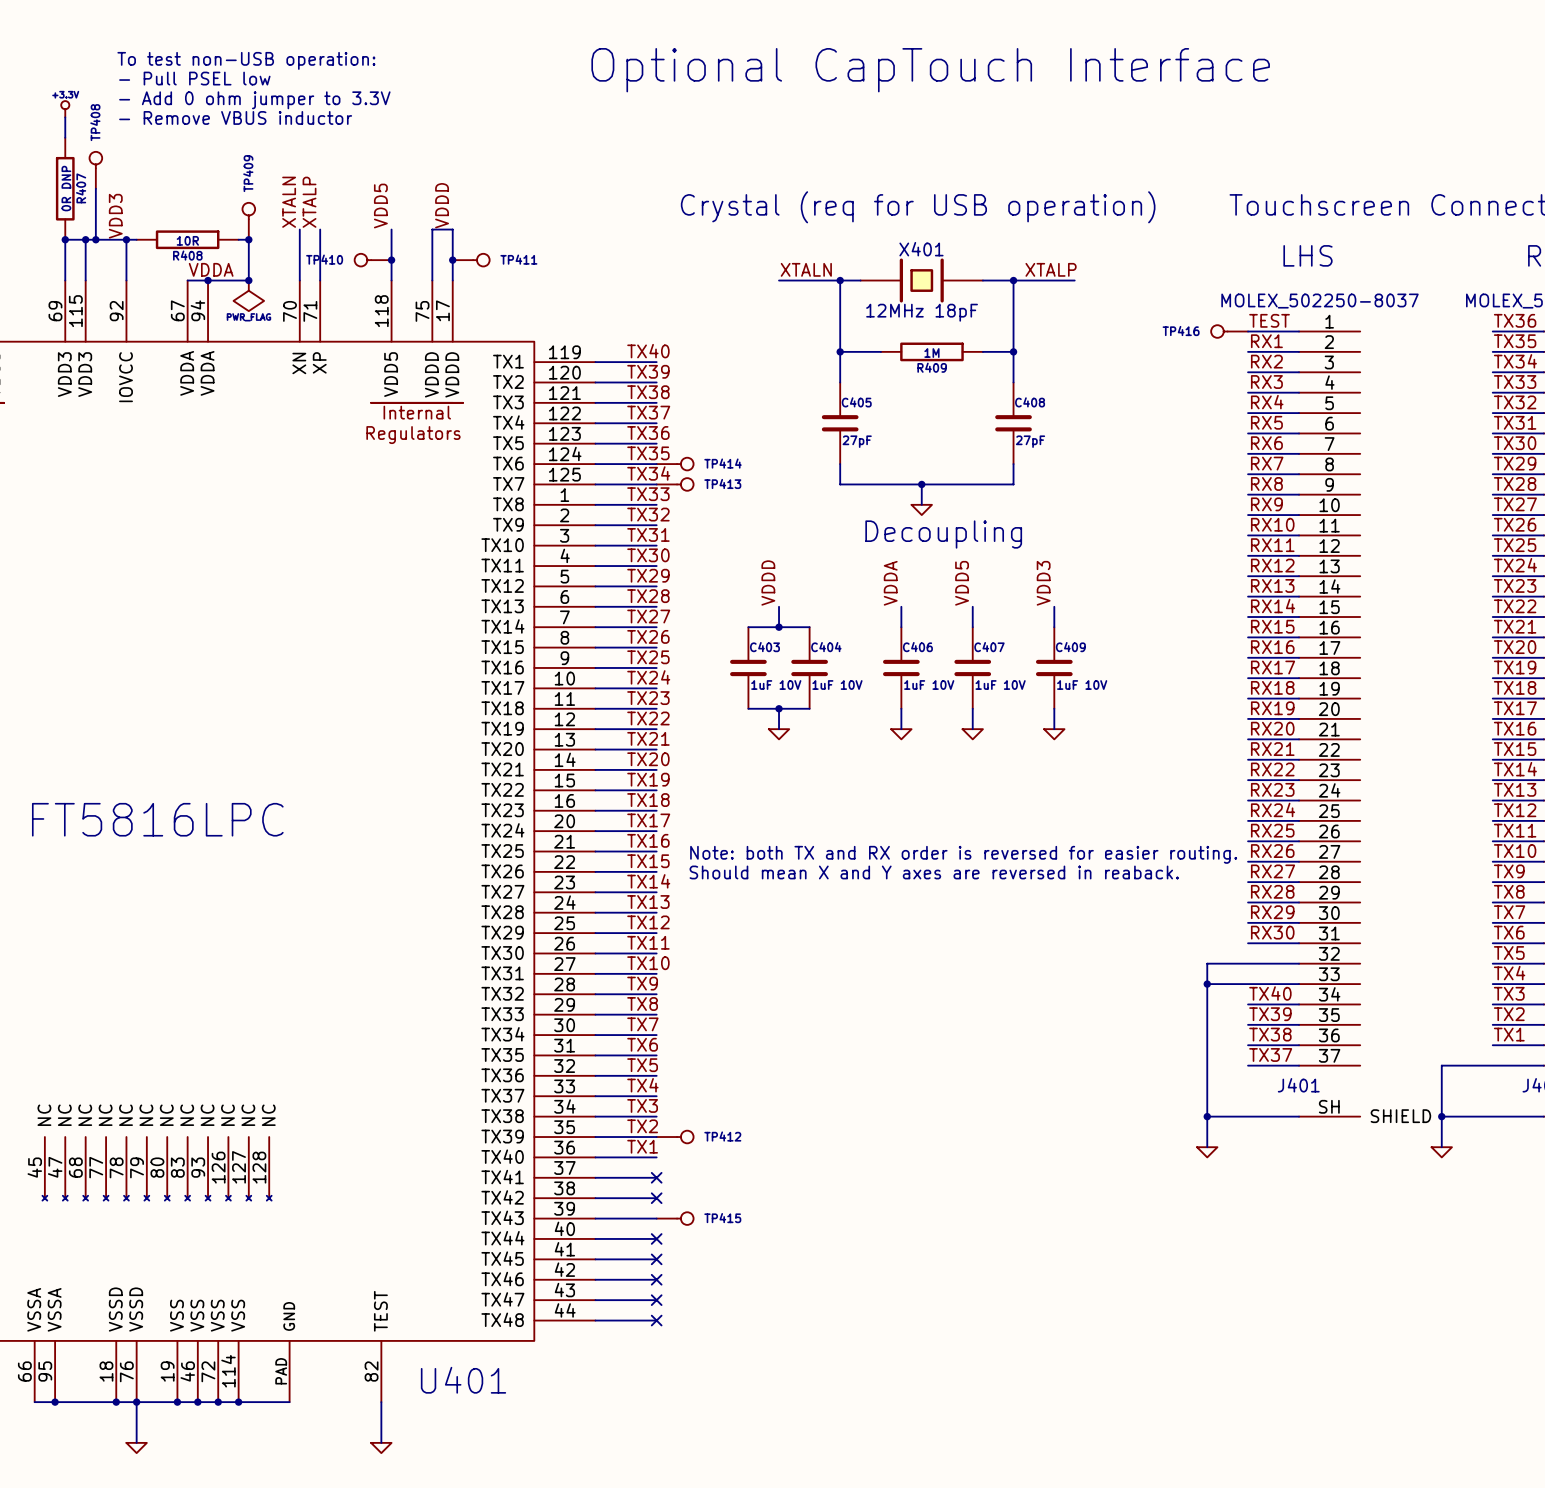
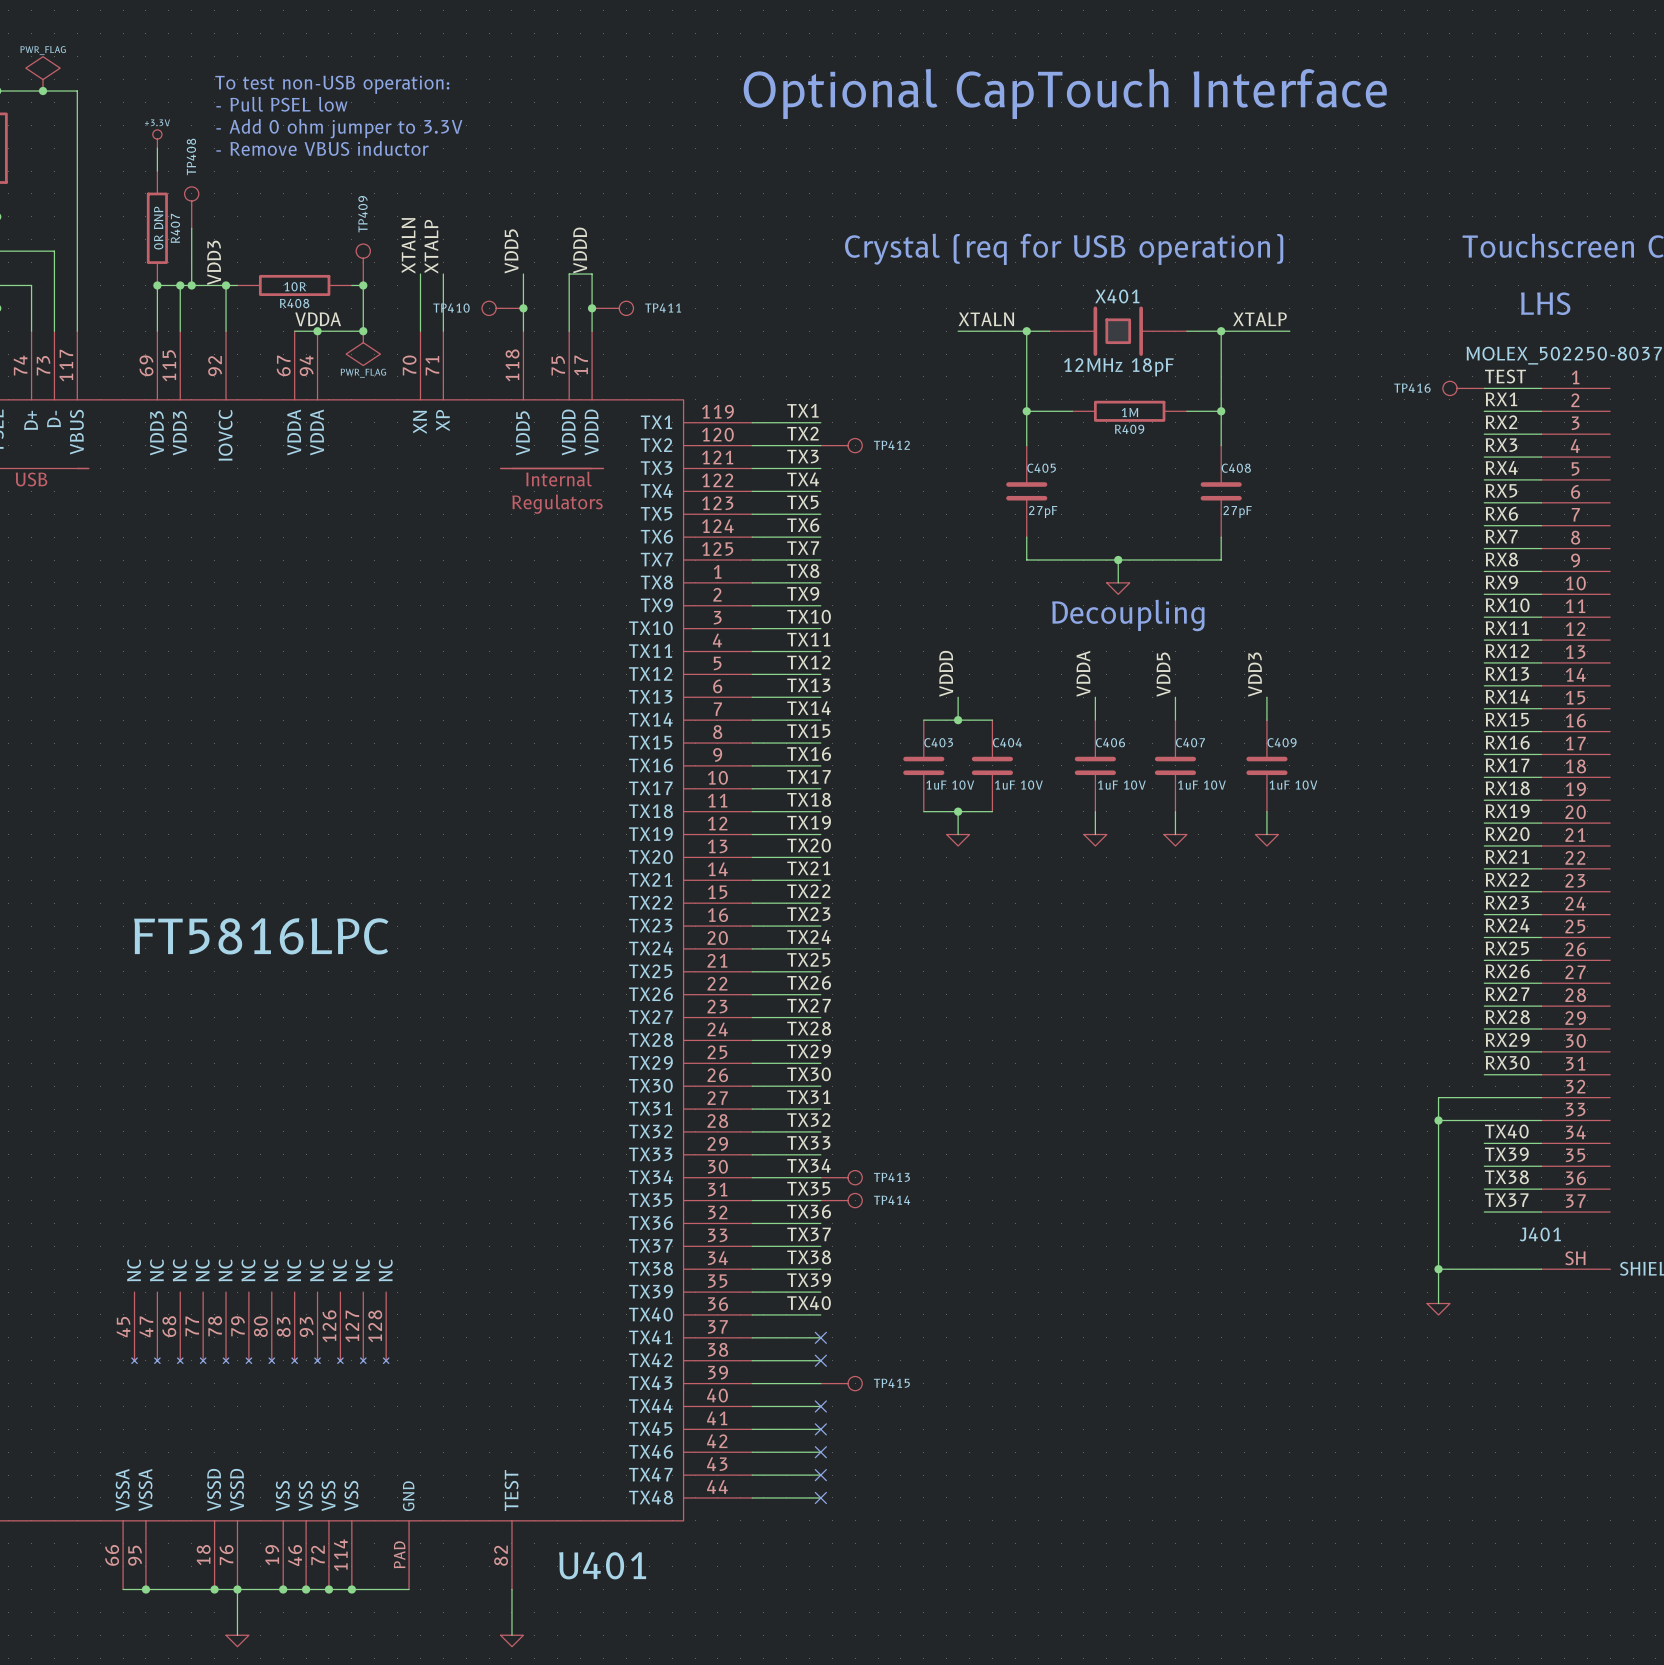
label: TX40 (648, 351) -> TX1 (802, 410)
label: TX39 (648, 371) -> TX2 (802, 433)
label: TX38 (648, 392) -> TX3 (802, 456)
label: TX37 (648, 412) -> TX4 (803, 479)
label: TX36 (648, 432) -> TX5 (802, 502)
label: TX35 (648, 453) -> TX6 (803, 525)
TP414 position: (675, 464) -> (841, 1200)
label: TX34 (648, 473) -> TX7 (803, 548)
TP413 position: (675, 484) -> (841, 1177)
label: TX33 (648, 494) -> TX8 (803, 570)
label: TX32 (648, 514) -> TX9 (803, 593)
label: TX31 (648, 534) -> TX10 (809, 616)
label: TX30 (648, 555) -> TX11 (808, 639)
label: TX29 (648, 575) -> TX12 (808, 662)
label: TX28 (648, 596) -> TX13 (808, 685)
label: TX27 (648, 616) -> TX14 (809, 708)
label: TX26 (648, 636) -> TX15 (808, 731)
label: TX25 (648, 657) -> TX16 (809, 754)
label: TX24 (648, 677) -> TX17 (809, 776)
label: TX23 (648, 698) -> TX18 (809, 799)
label: TX22 (648, 718) -> TX19 (809, 822)
label: TX21 (648, 738) -> TX20 (809, 845)
label: TX20 (648, 759) -> TX21 (808, 868)
label: TX19 (648, 779) -> TX22 (808, 891)
label: TX18 (648, 800) -> TX23 (808, 914)
label: TX17 (648, 820) -> TX24 (809, 936)
label: TX16 (648, 840) -> TX25 (808, 959)
text: Note: both TX and RX order is reversed for easier routing. (963, 854) -> none
label: TX15 (648, 861) -> TX26 (809, 982)
text: Should mean X and Y axes are reversed in reaback. (934, 872) -> none
label: TX14 (648, 881) -> TX27 (809, 1005)
label: TX13 (648, 902) -> TX28 (809, 1028)
label: TX12 (648, 922) -> TX29 (809, 1051)
label: TX11 (648, 942) -> TX30 (809, 1074)
label: TX10 (648, 963) -> TX31 (808, 1097)
label: TX9 (642, 983) -> TX32 (808, 1119)
label: TX8 (642, 1003) -> TX33 (808, 1142)
label: TX7 (642, 1024) -> TX34 (809, 1165)
label: TX6 (642, 1044) -> TX35 (808, 1188)
label: TX5 (642, 1065) -> TX36 (809, 1211)
label: TX4 (642, 1085) -> TX37 (809, 1234)
label: TX3 (642, 1105) -> TX38 (809, 1257)
label: TX2 (642, 1126) -> TX39 (809, 1280)
TP412 position: (675, 1137) -> (841, 445)
label: TX1 (642, 1146) -> TX40 (809, 1303)

